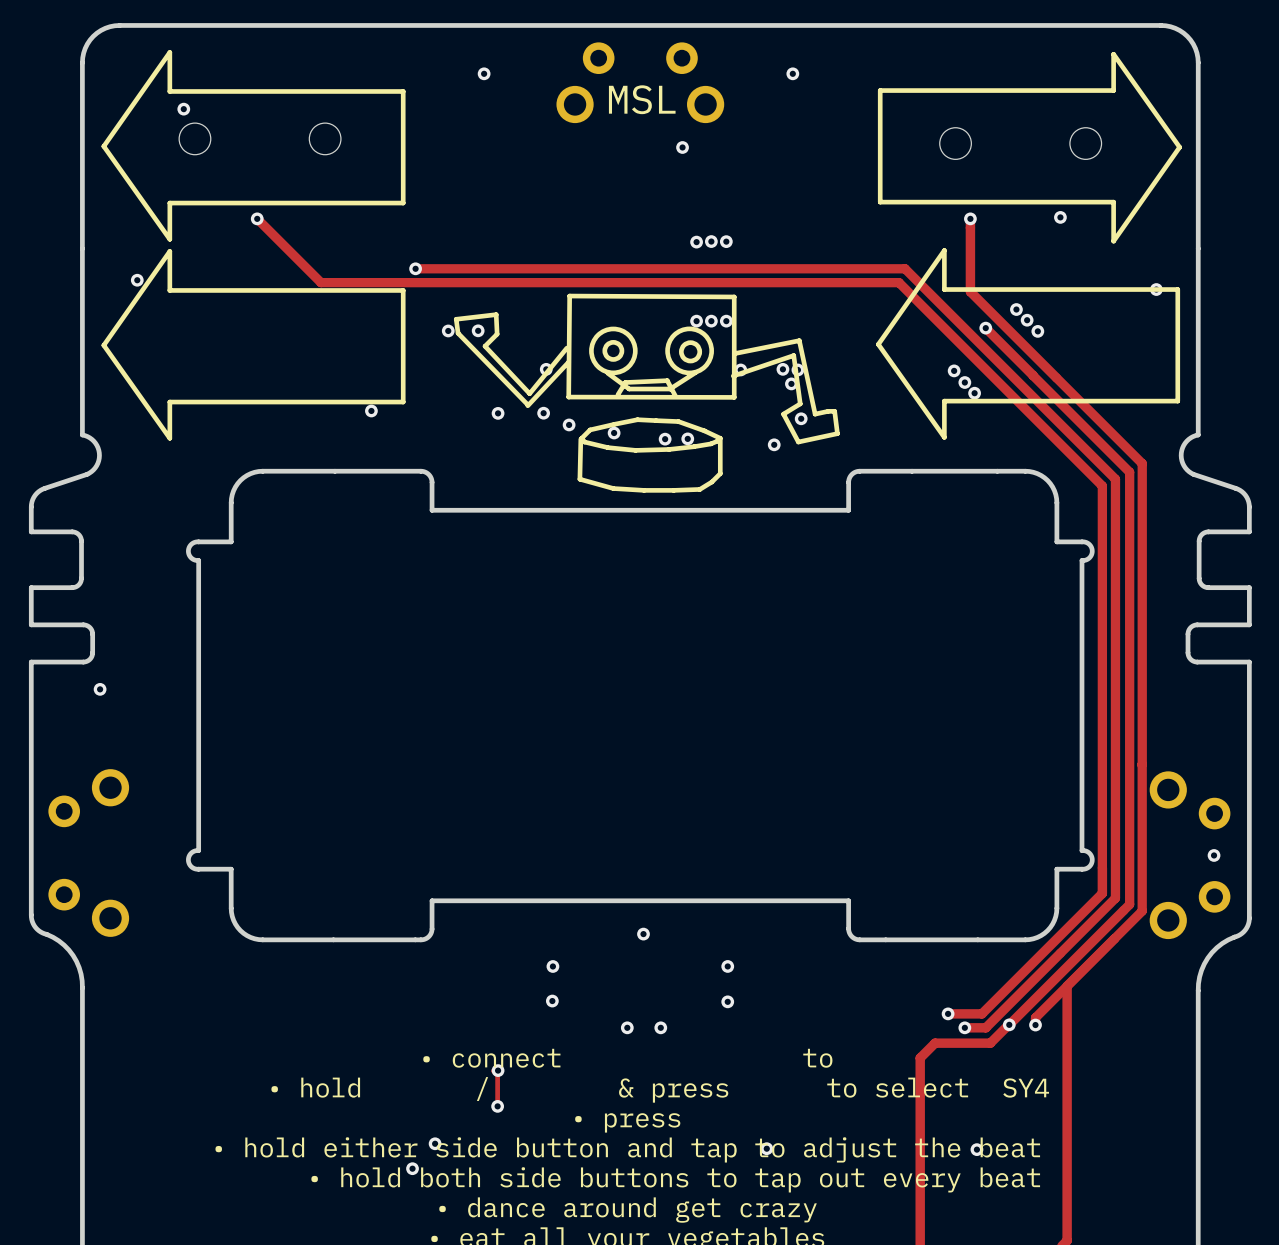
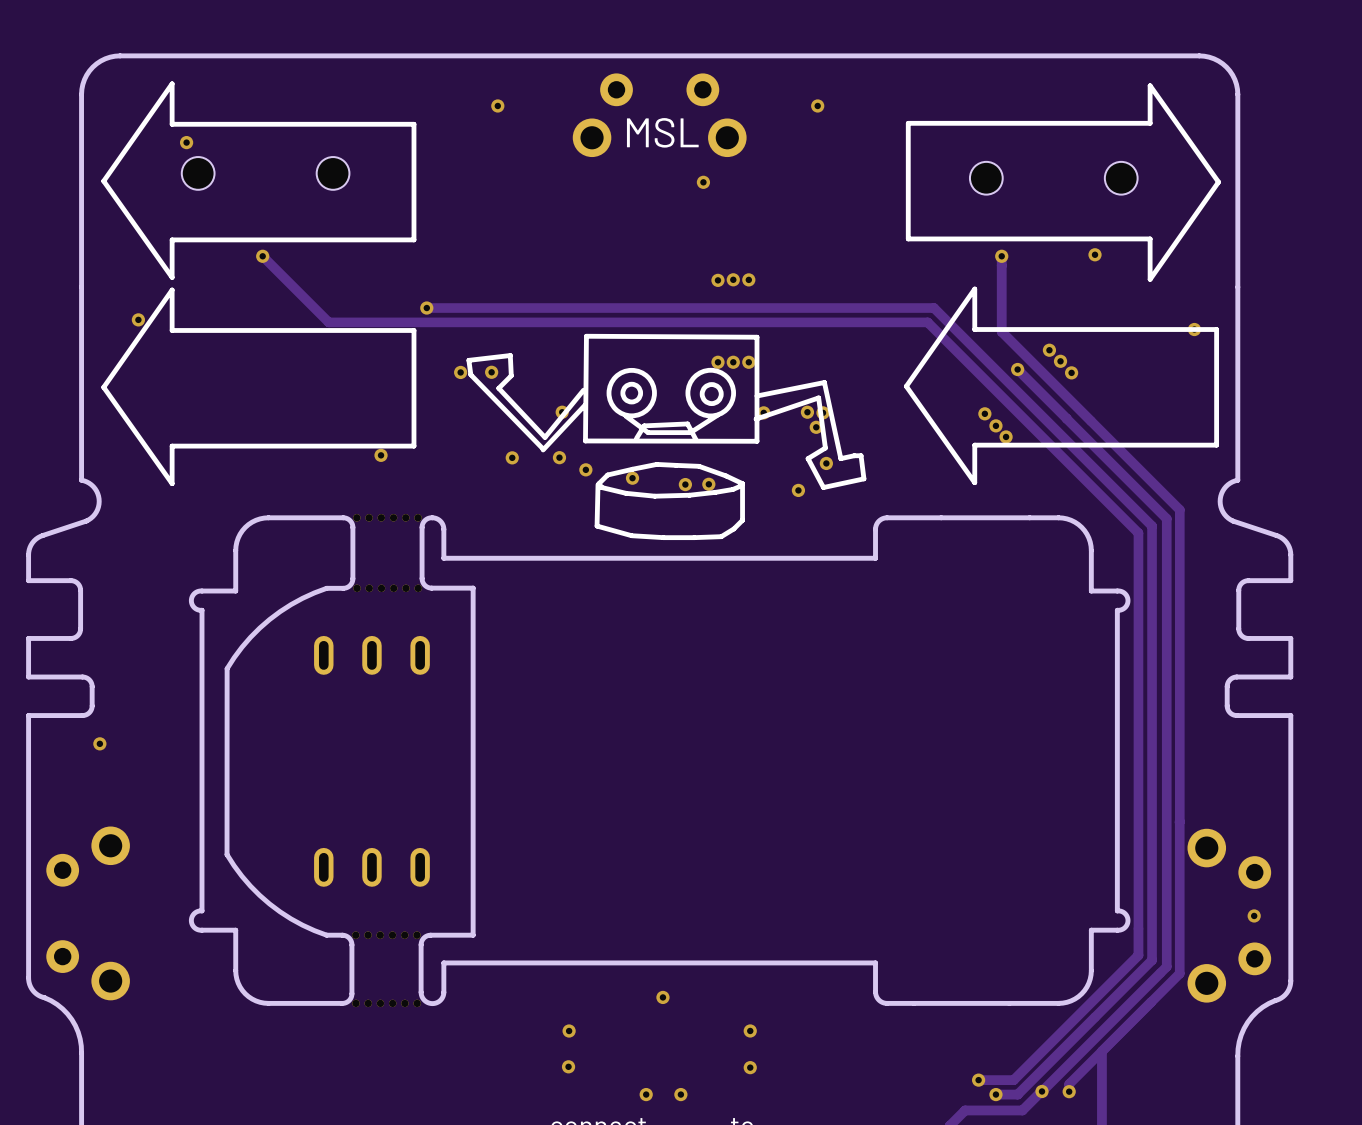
board edge: (334, 471) (420, 471) -> (443, 992) (441, 999) (435, 1003) (428, 1002) (421, 996) (421, 943) (423, 938) (429, 935) (473, 935) (473, 588) (430, 588) (423, 583) (422, 526) (425, 520) (432, 517)
part: none -> (387, 517)
part: none -> (387, 588)
part: none -> (371, 655)
part: none -> (371, 867)
part: none -> (386, 935)
board edge: (432, 929) (429, 935) (422, 939) (333, 939) -> (343, 517) (349, 519) (352, 526) (352, 578) (350, 584) (345, 587) (326, 588) (314, 592) (280, 611) (250, 637) (227, 668) (227, 854) (250, 886) (280, 911) (314, 930) (326, 935) (344, 935) (349, 938) (351, 945) (351, 994) (348, 1000) (341, 1003)
part: none -> (386, 1003)

